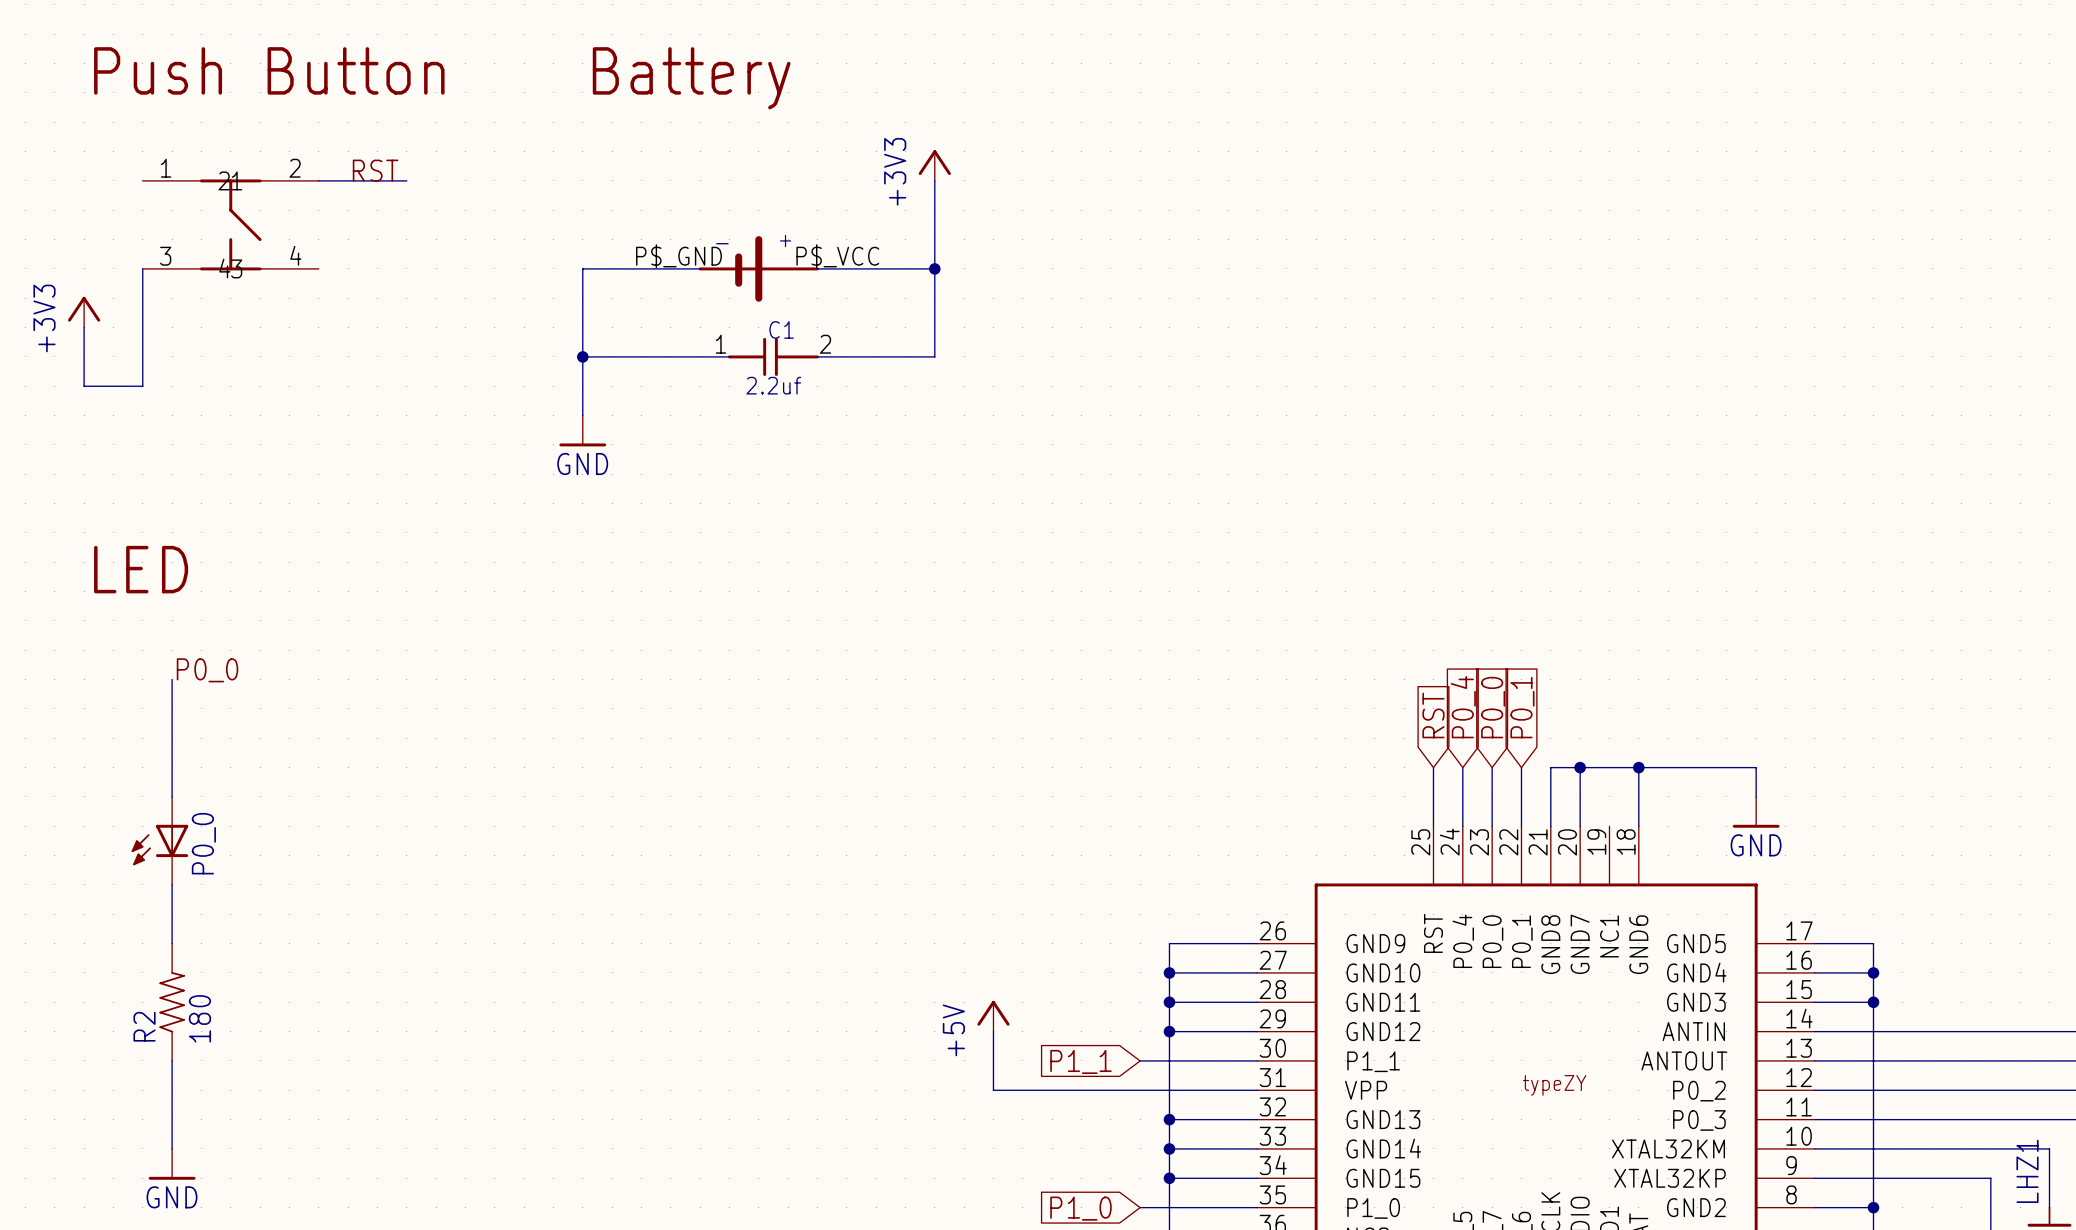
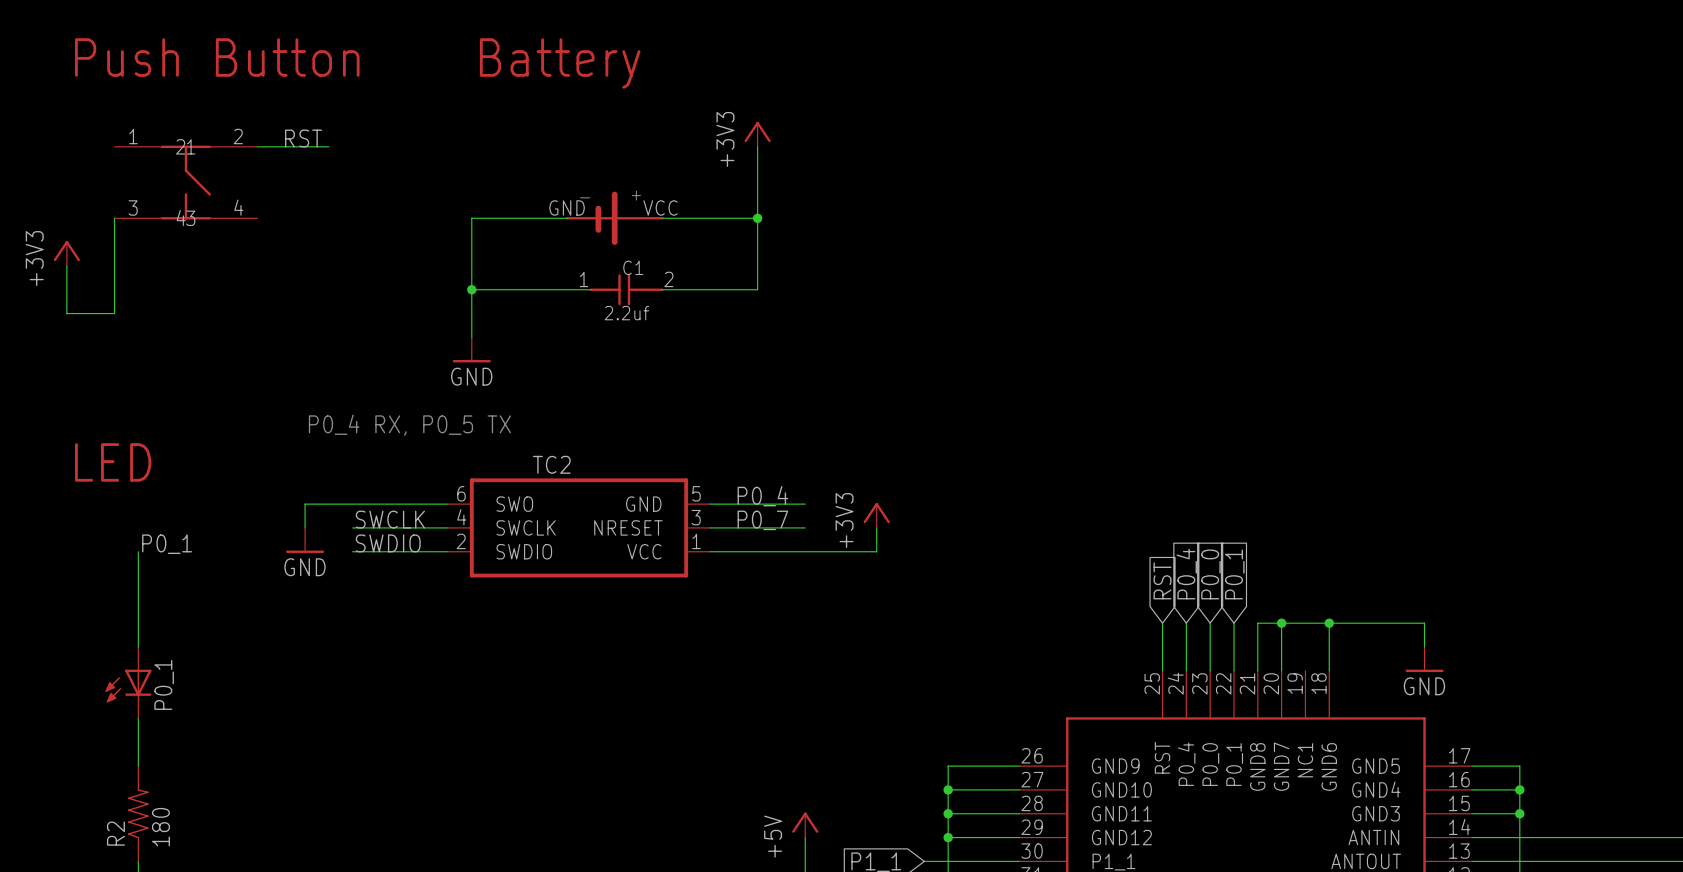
part pin number: P$_GND (678, 256) -> GND (567, 207)
part pin number: P$_VCC (837, 256) -> VCC (660, 207)
text: none -> P0_4 RX, P0_5 TX (409, 425)
label: none -> P0_4 (762, 496)
wire: none -> (447, 504) (305, 504) (305, 527)
wire: none -> (709, 504) (805, 504)
power symbol: none -> +3V3 (876, 515)
label: none -> SWCLK (390, 519)
label: none -> P0_7 (762, 520)
wire: none -> (352, 527) (447, 527)
TC2: none -> (578, 527)
wire: none -> (709, 527) (805, 527)
wire: none -> (876, 527) (876, 551) (709, 551)
power symbol: none -> GND (305, 540)
label: none -> SWDIO (388, 543)
label: P0_0 (207, 670) -> P0_1 (167, 544)
wire: none -> (352, 551) (447, 551)
P0_0 name: P0_0 (203, 843) -> P0_1 (164, 684)

